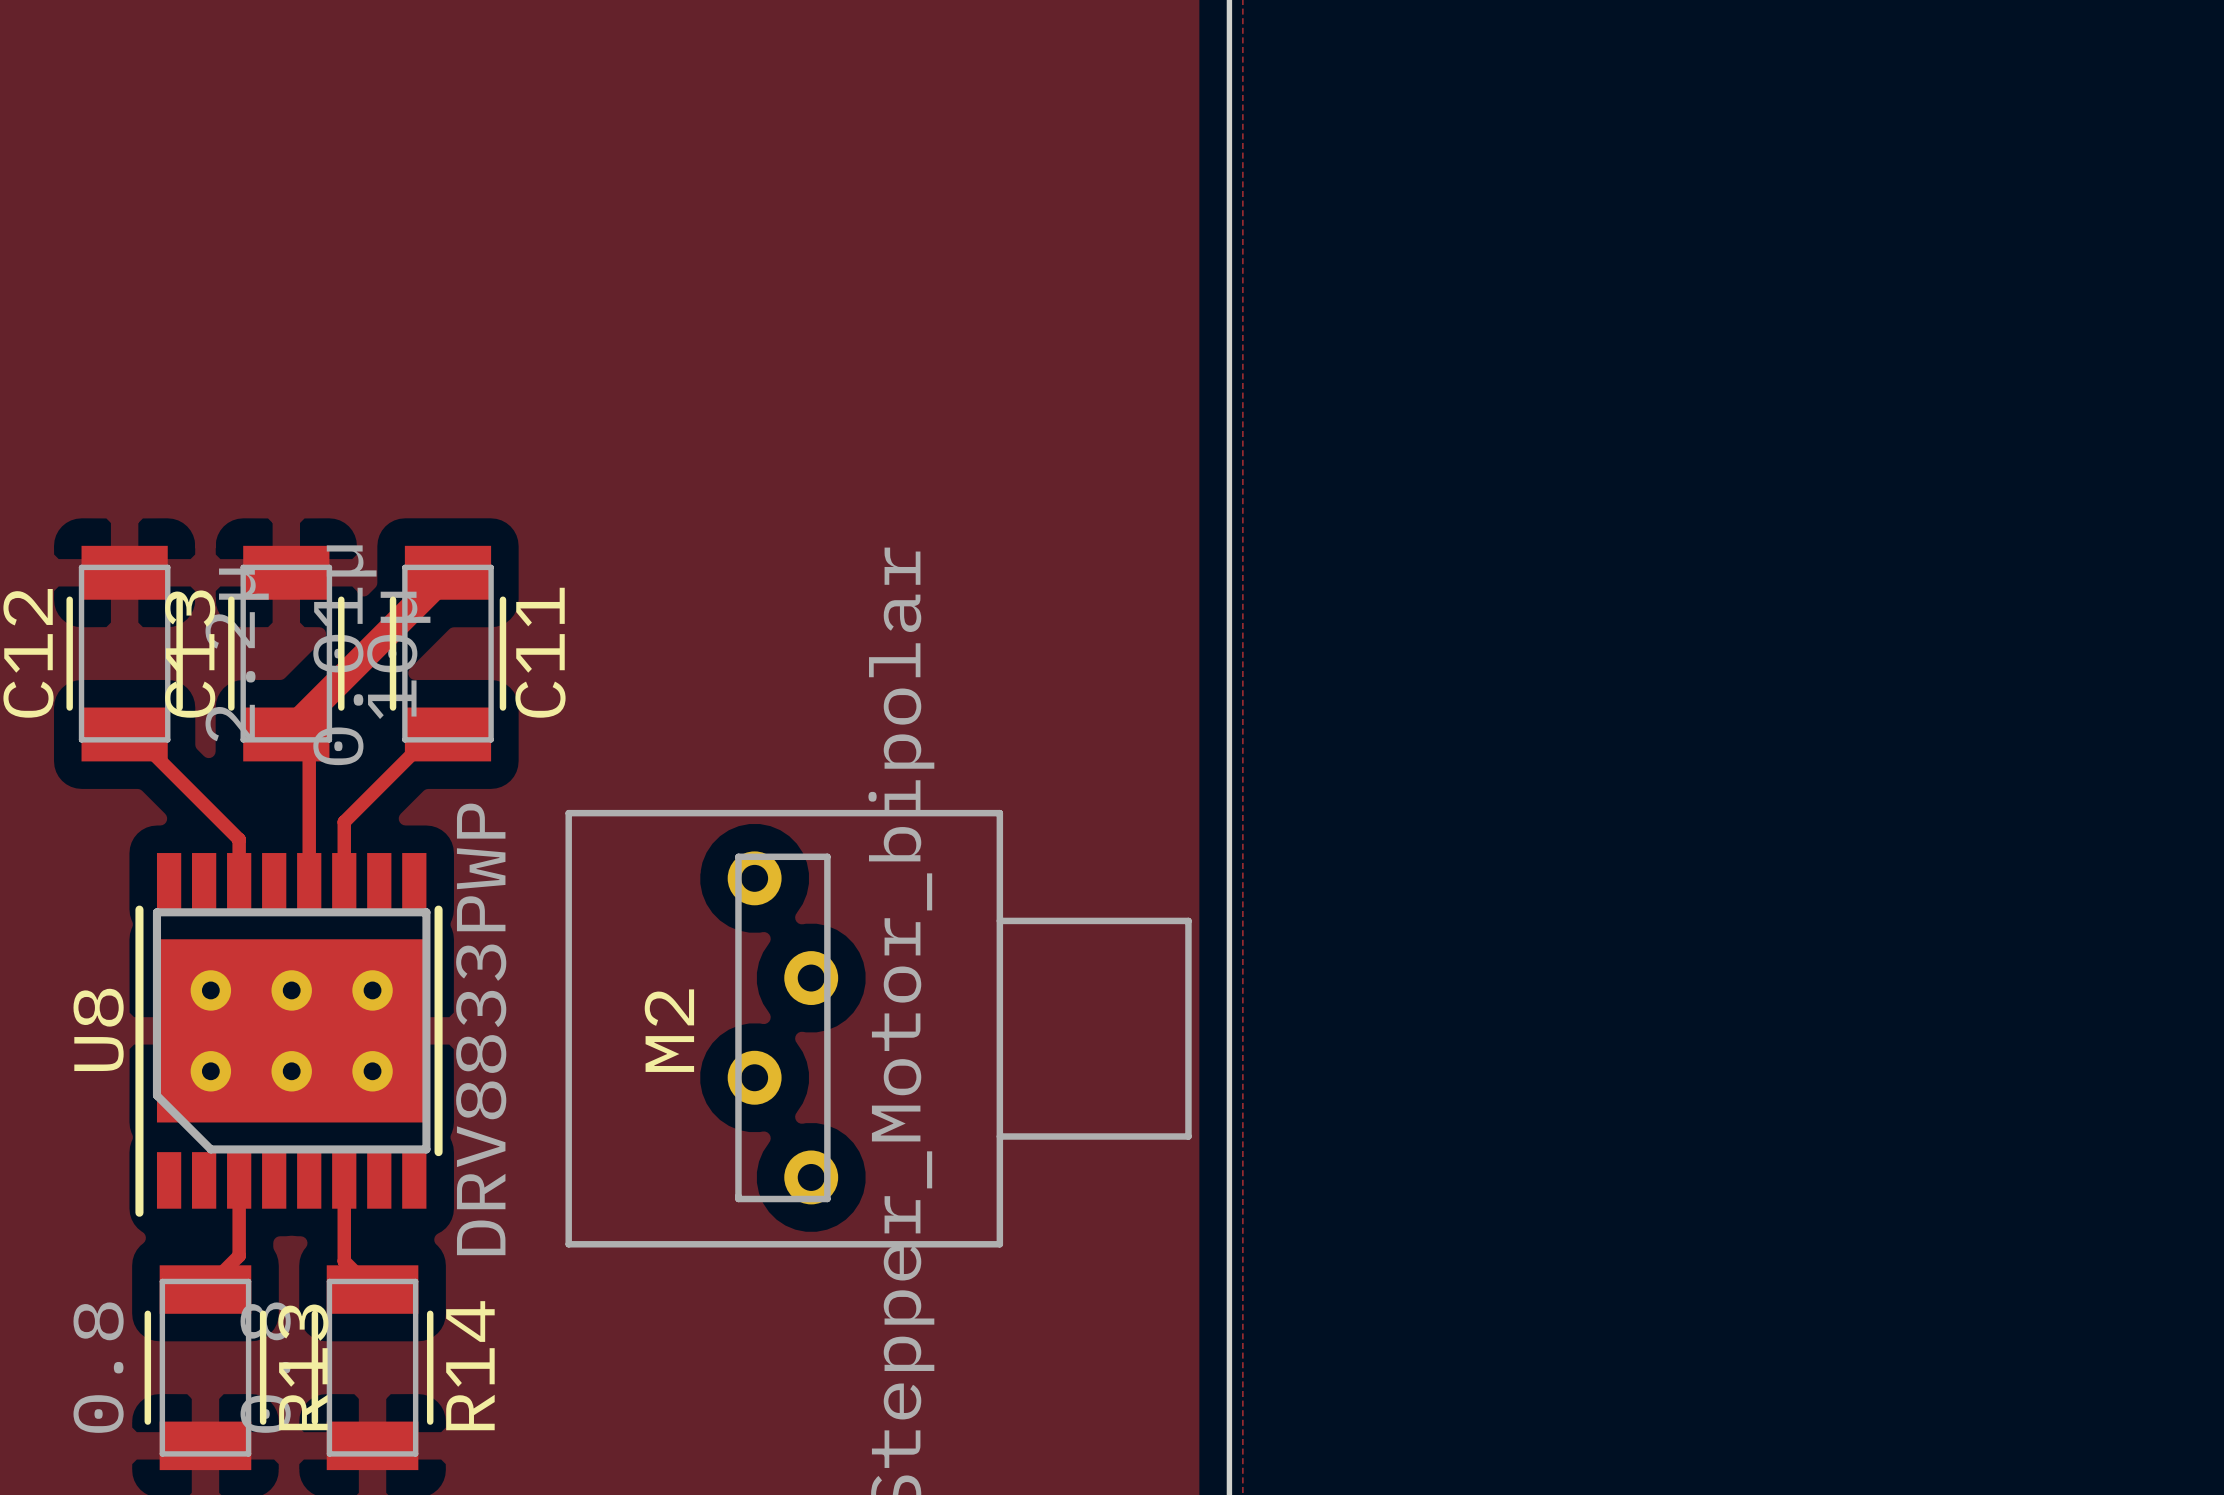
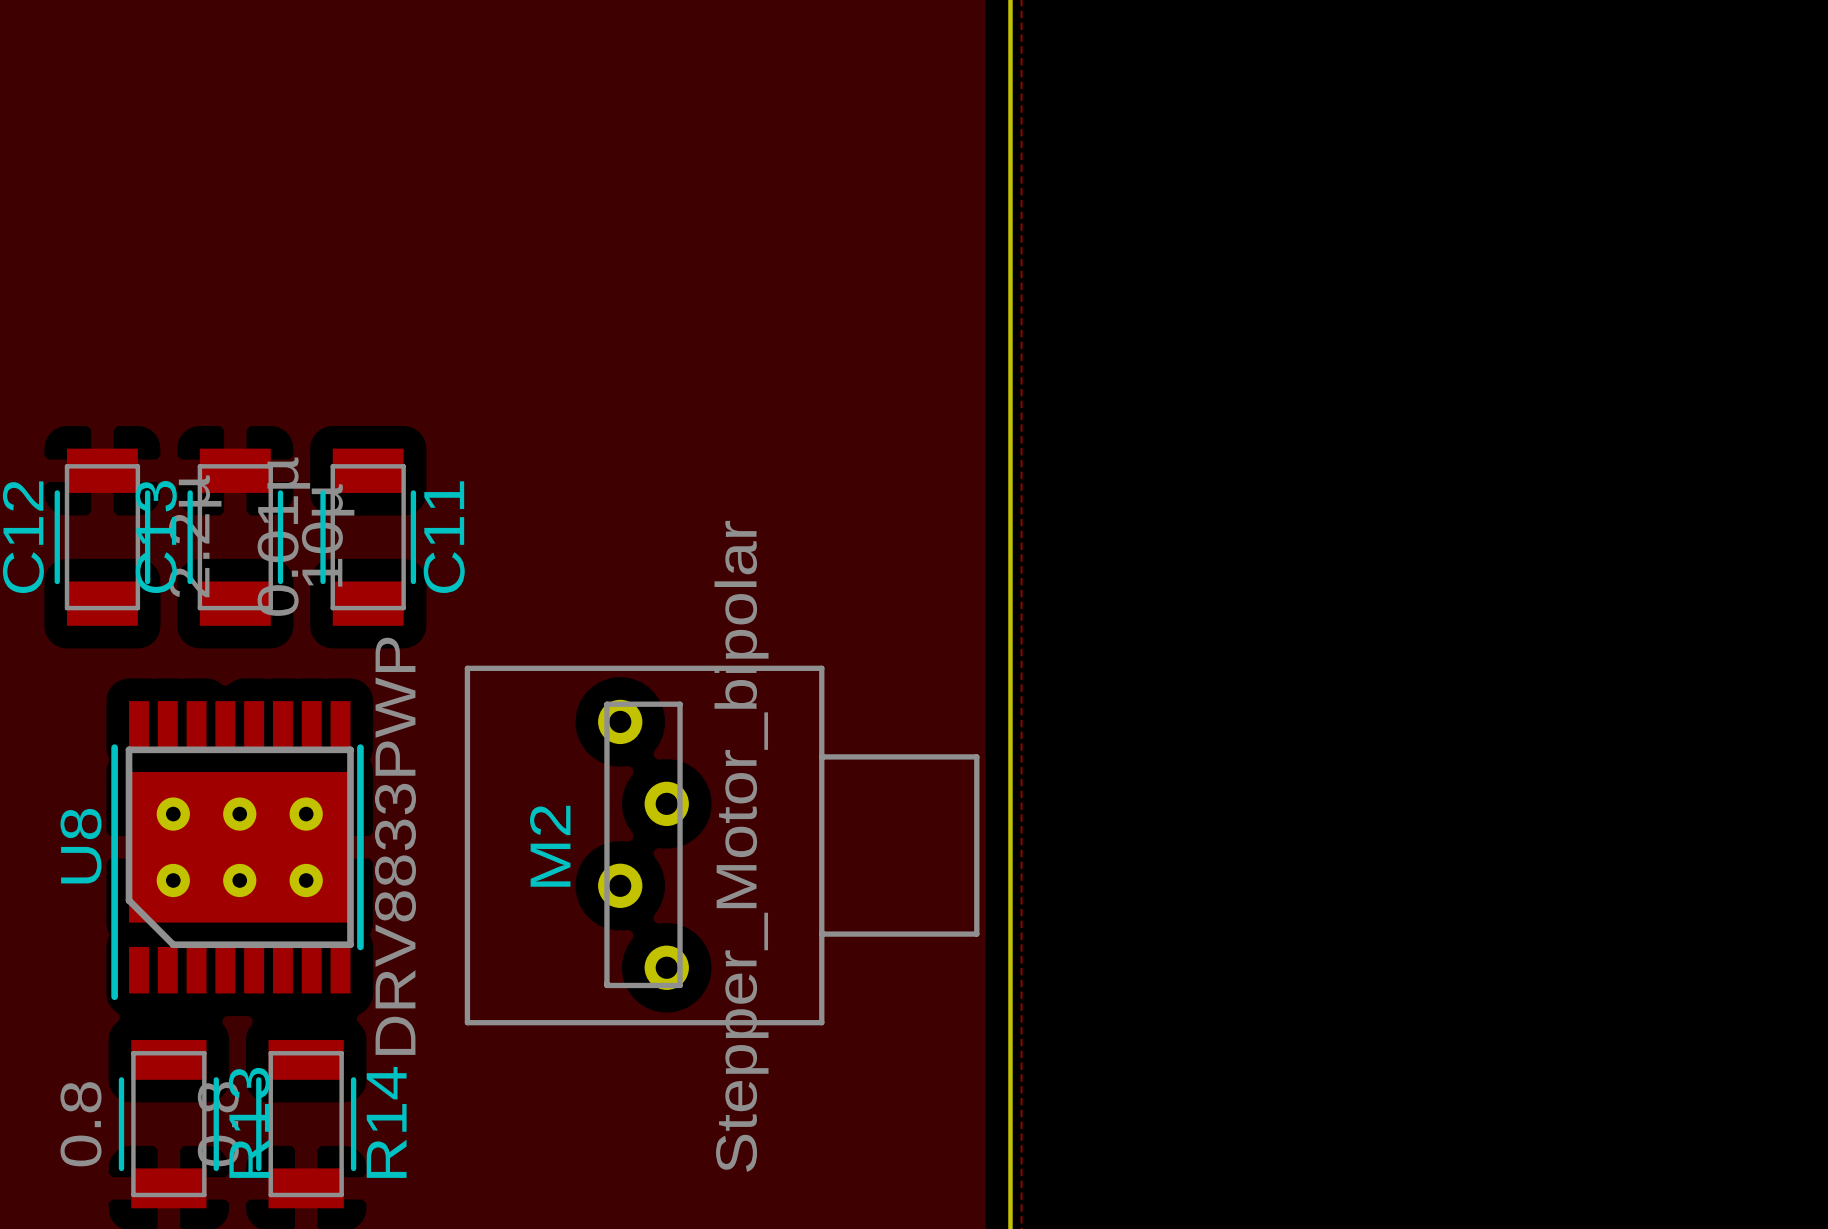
track: (447, 572) (286, 734) (309, 757) (309, 881) -> none
track: (124, 734) (134, 734) (239, 839) (239, 881) -> none
track: (447, 734) (431, 734) (344, 822) (344, 881) -> none
track: (239, 1180) (239, 1255) (205, 1289) -> none
track: (344, 1180) (344, 1261) (372, 1289) -> none

